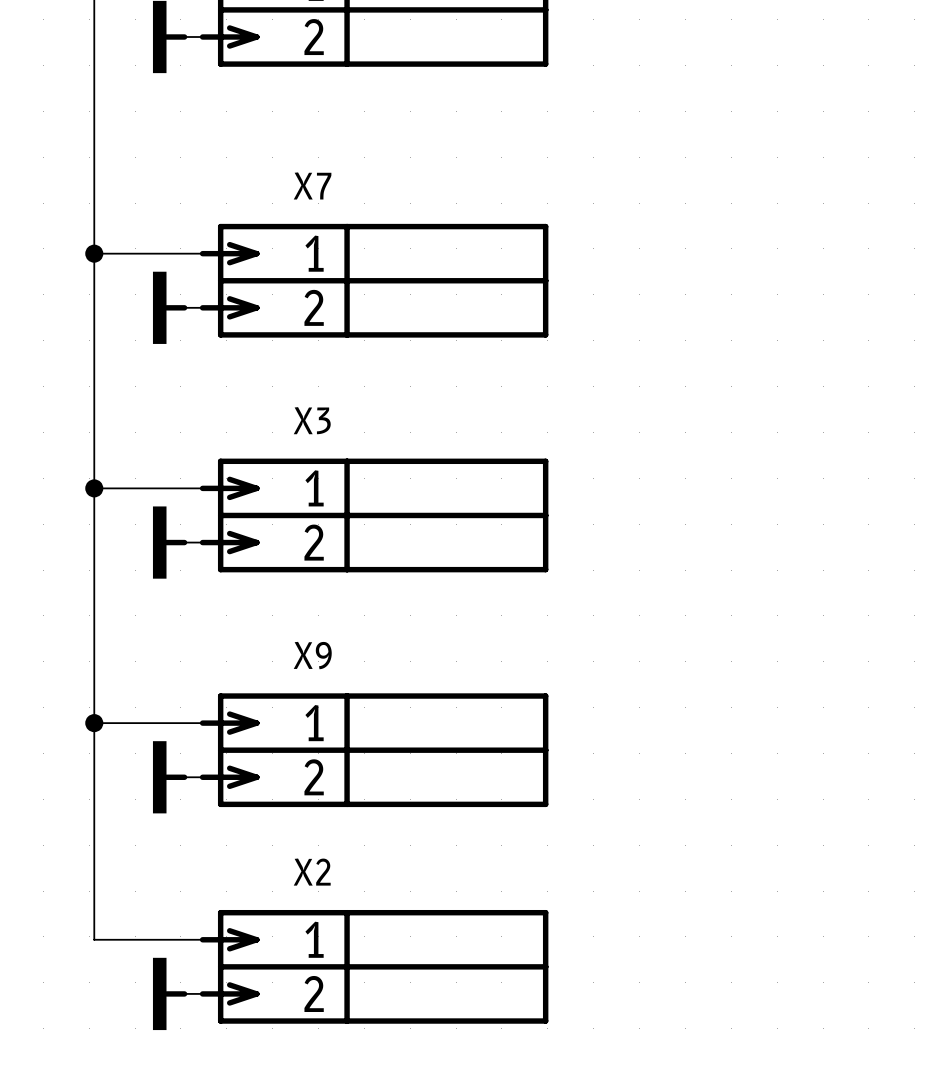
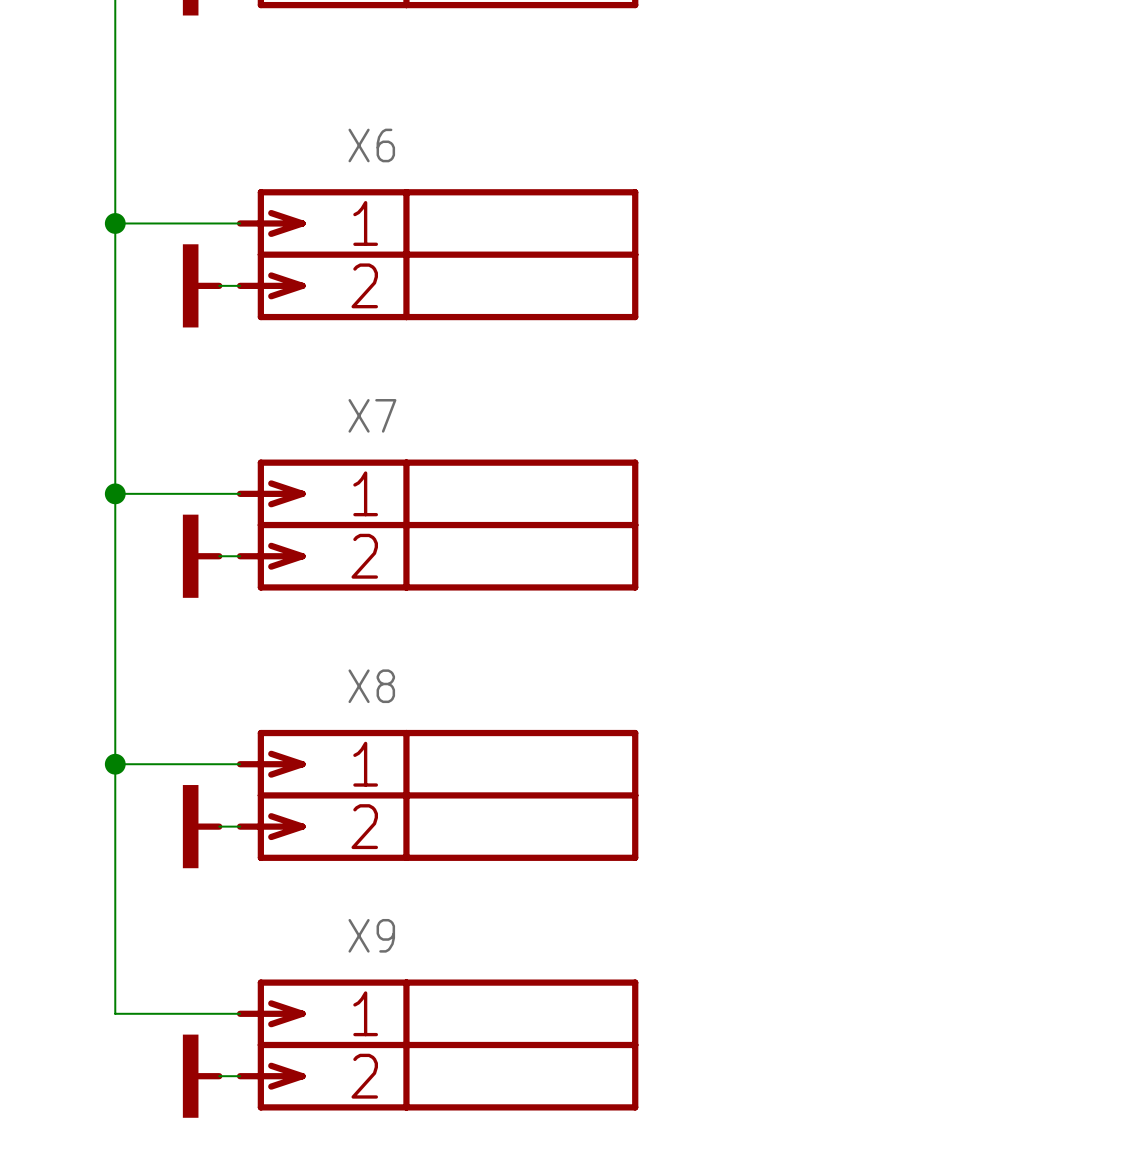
X7 name: X7 (312, 185) -> X6 (371, 145)
X3 name: X3 (312, 420) -> X7 (372, 415)
X9 name: X9 (312, 655) -> X8 (371, 686)
X2 name: X2 (312, 872) -> X9 (371, 935)

